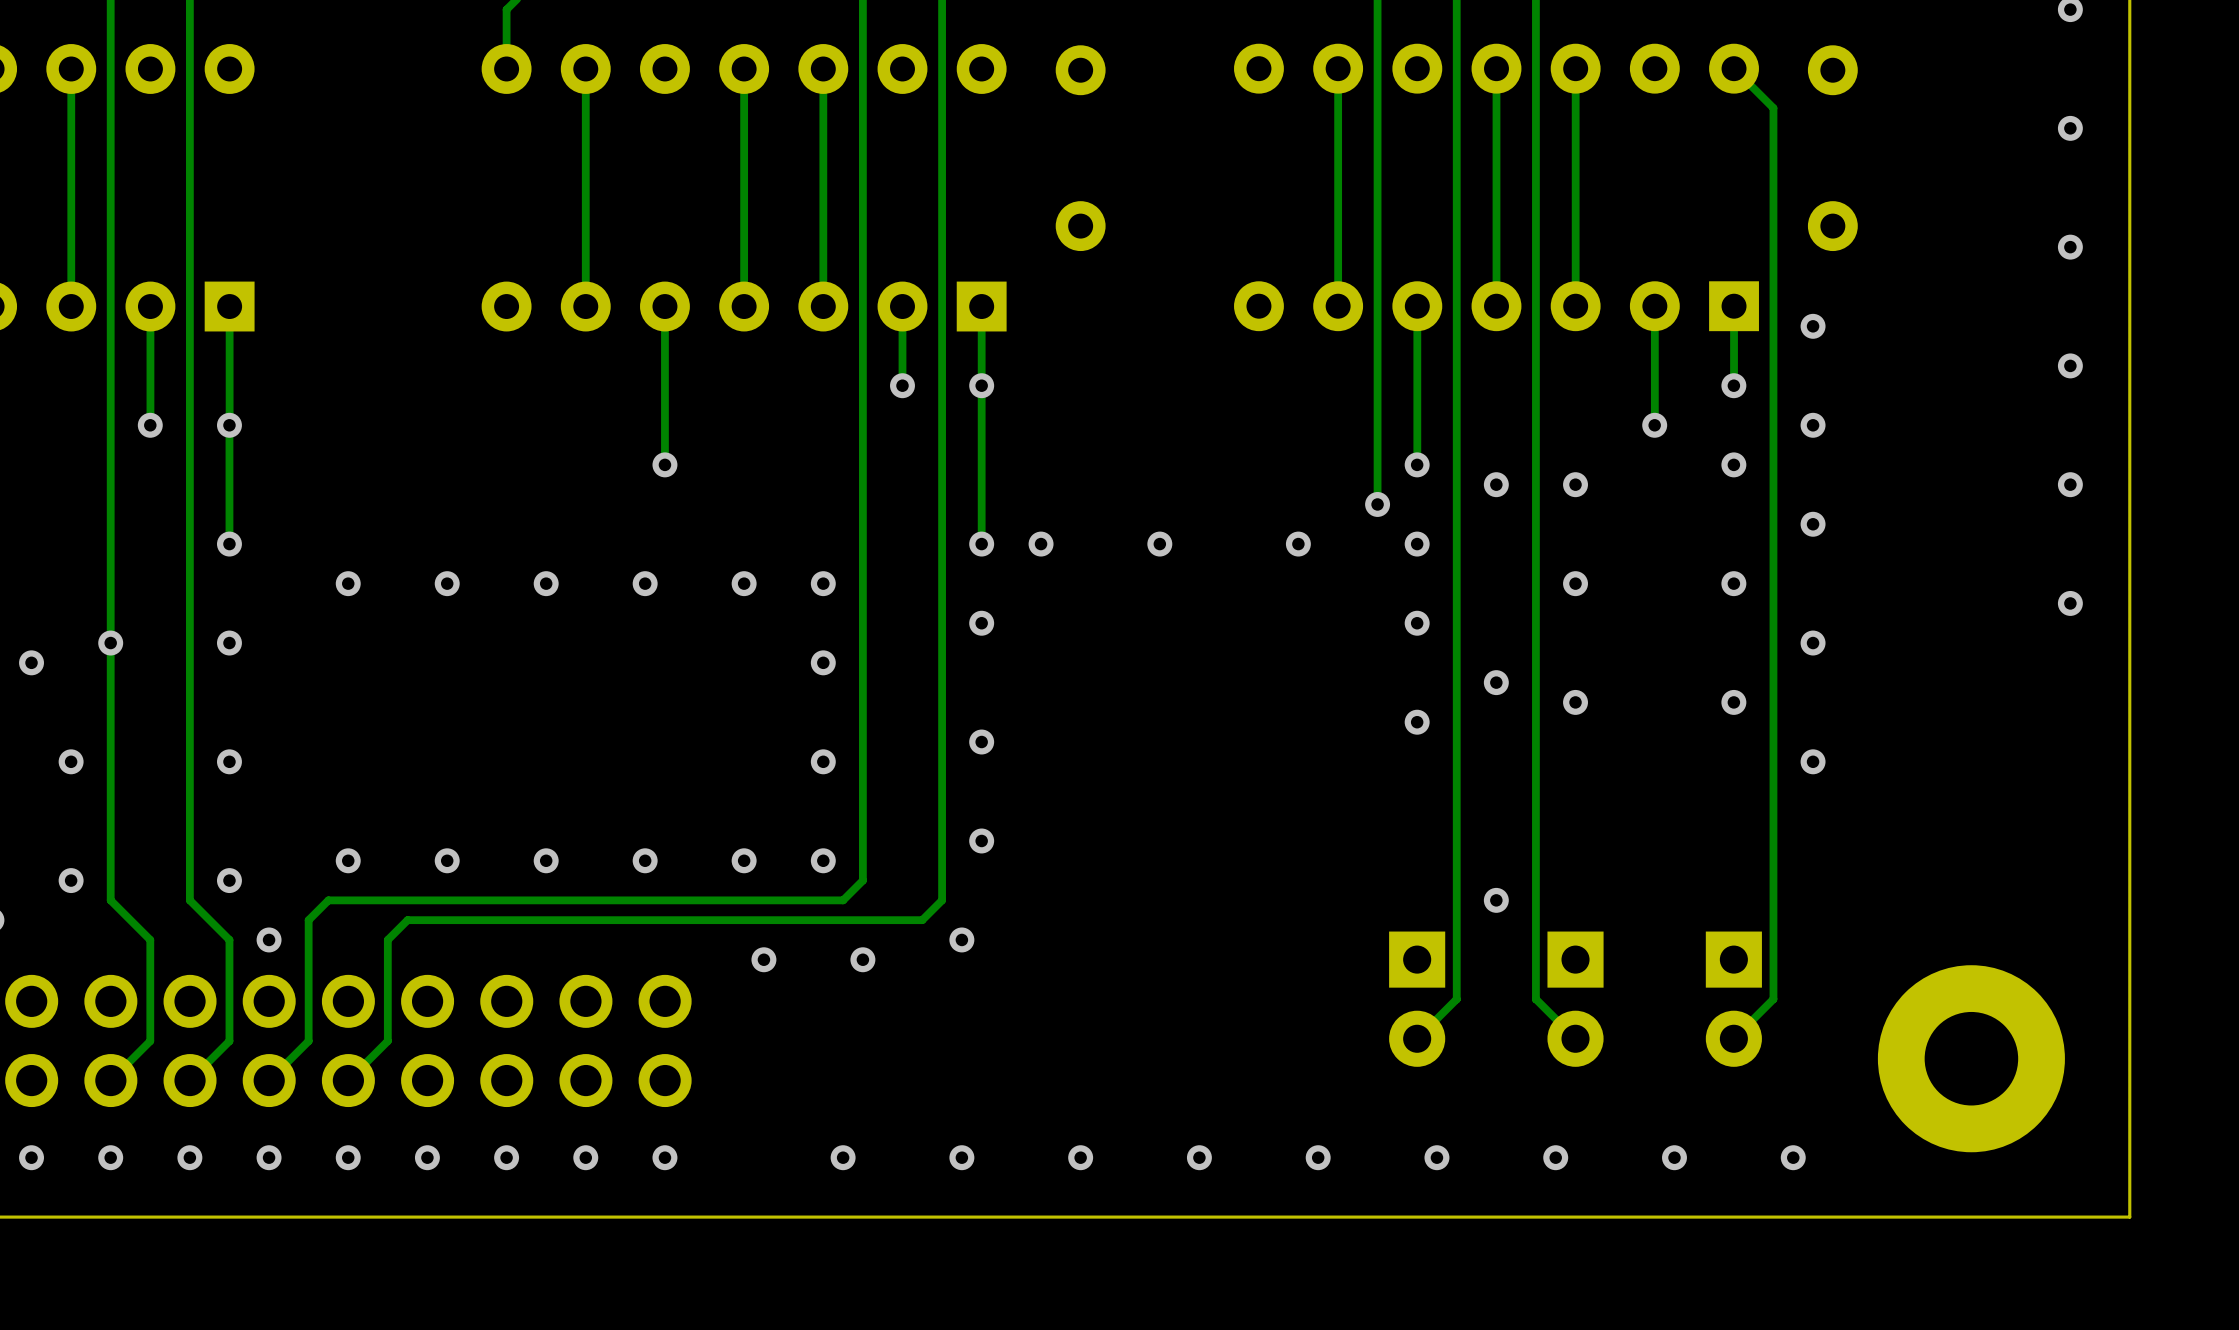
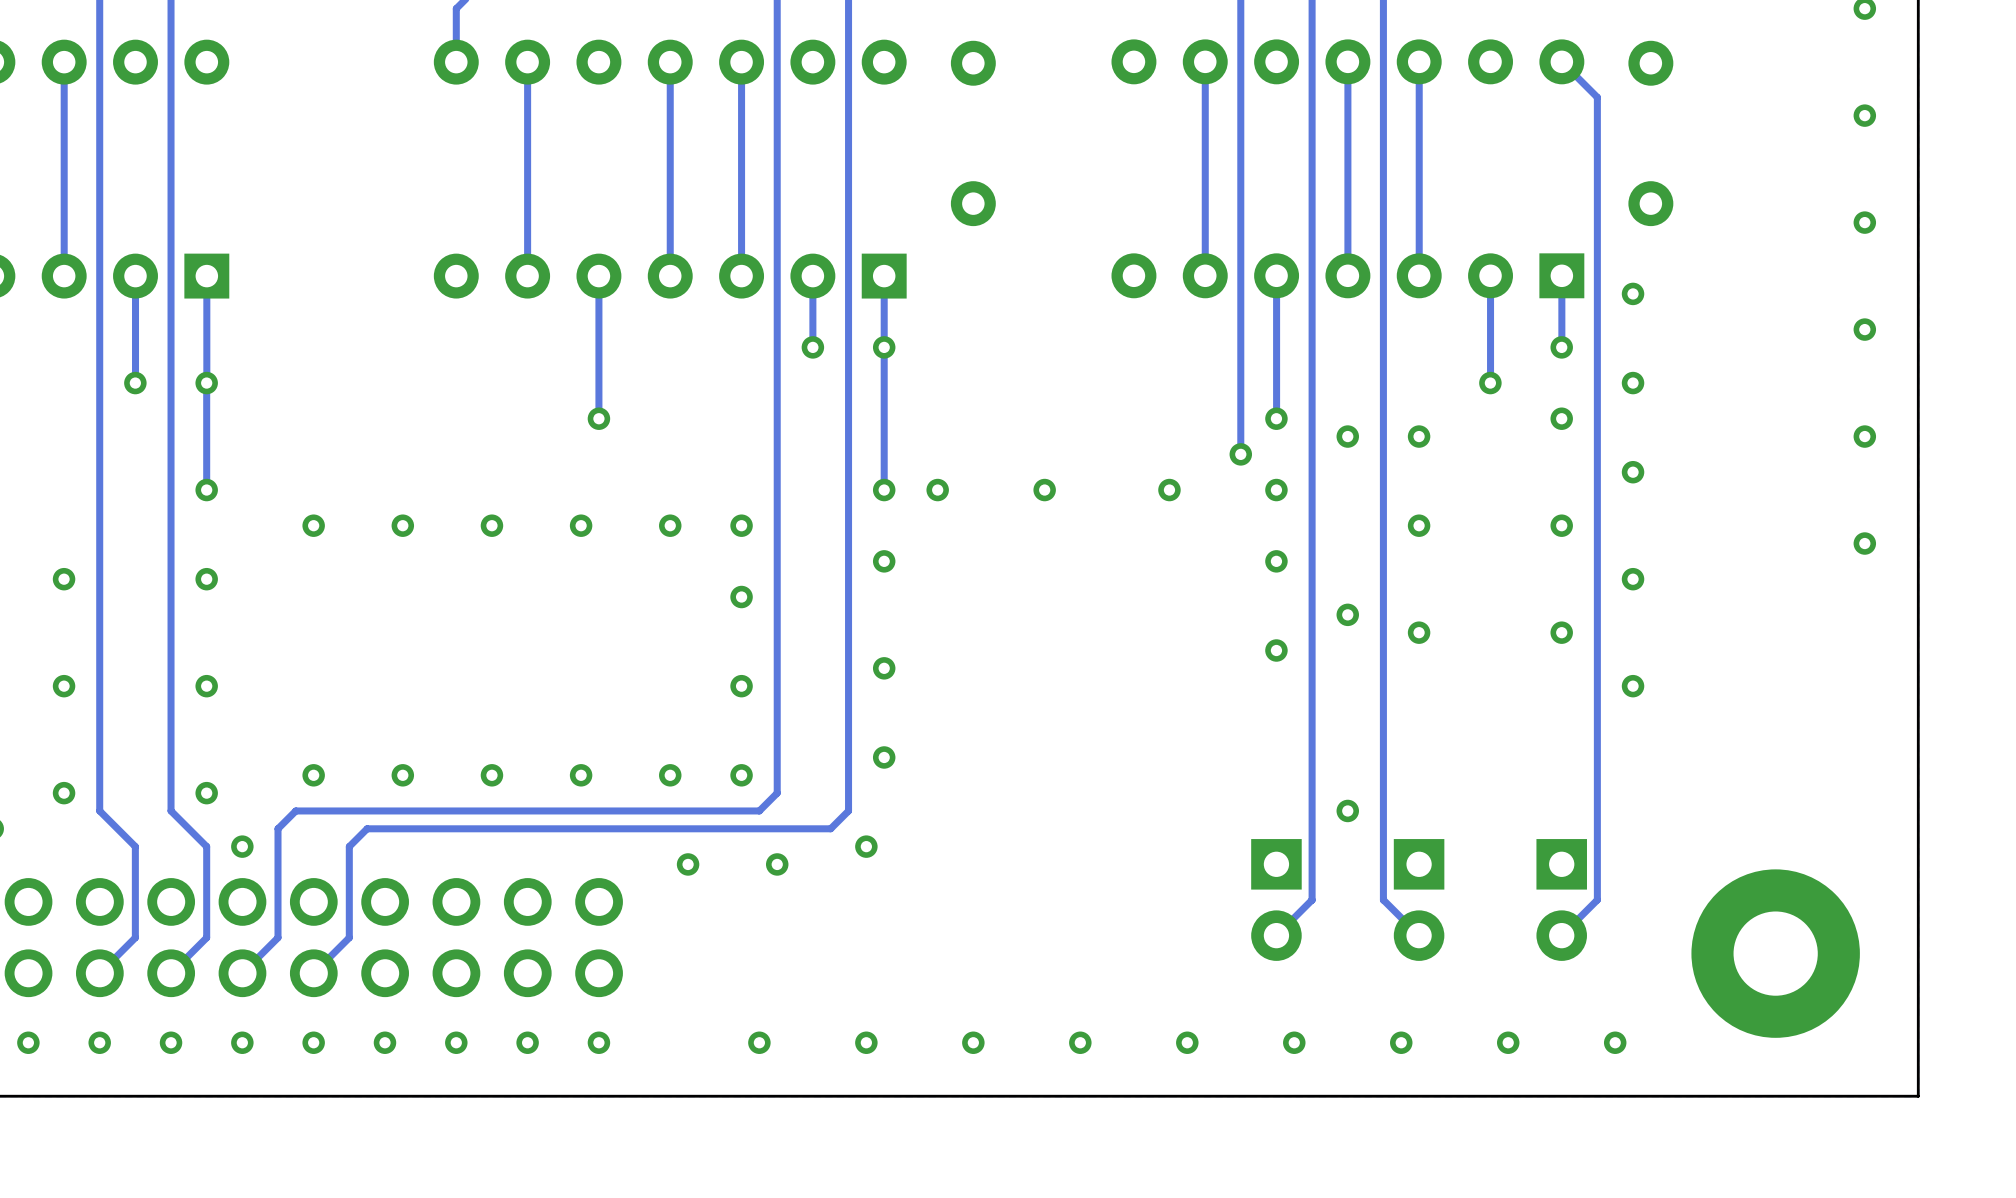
via: none -> (64, 579)
via: (110, 643) -> none
via: (31, 662) -> none

